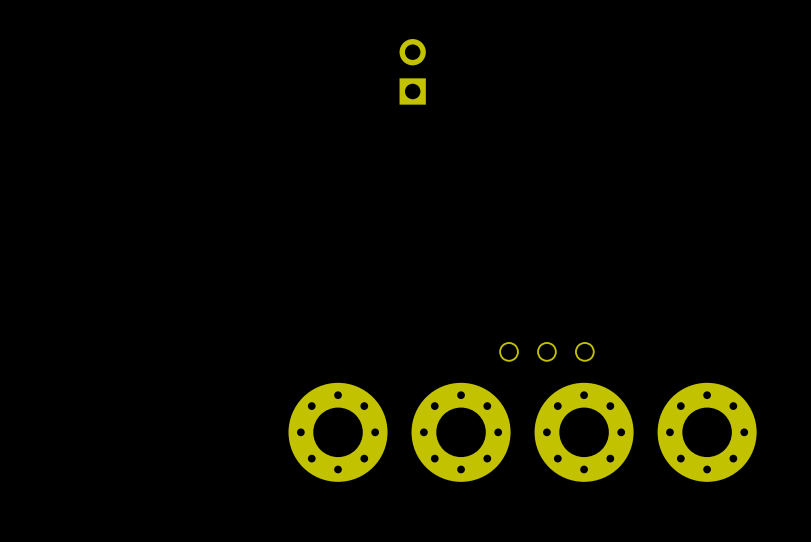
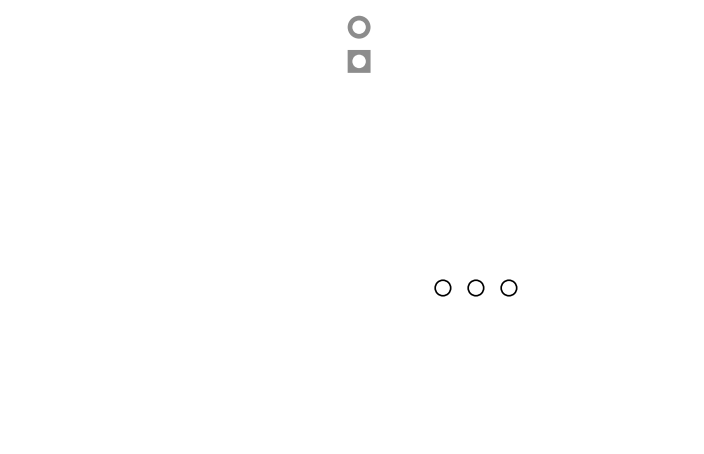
part: (338, 432) -> none
part: (461, 432) -> none
part: (584, 432) -> none
part: (707, 432) -> none

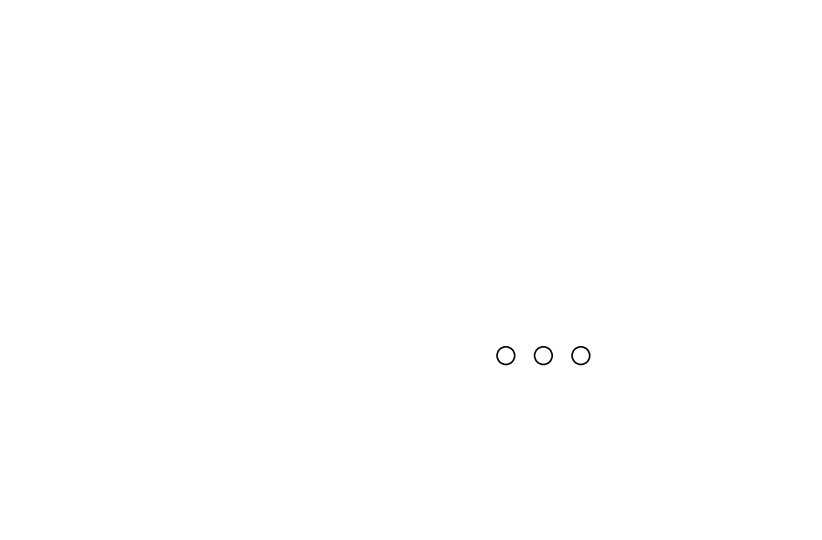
part: (359, 44) -> none

